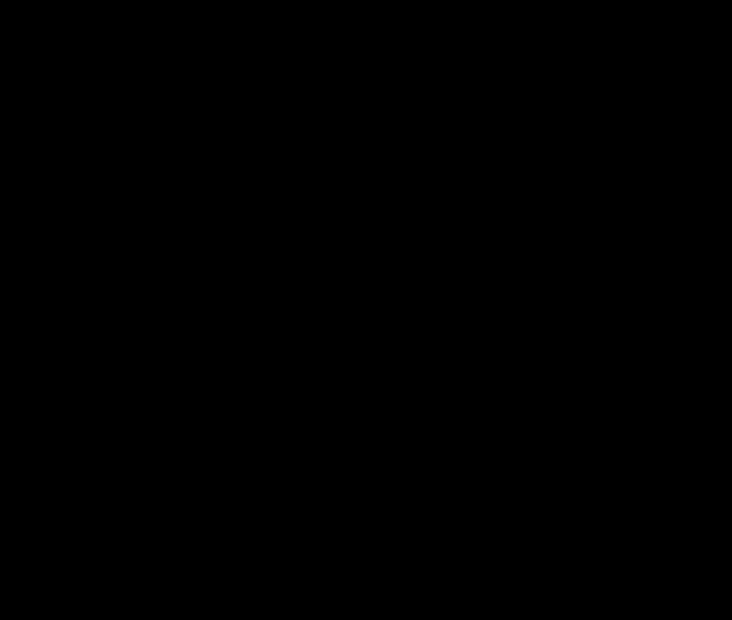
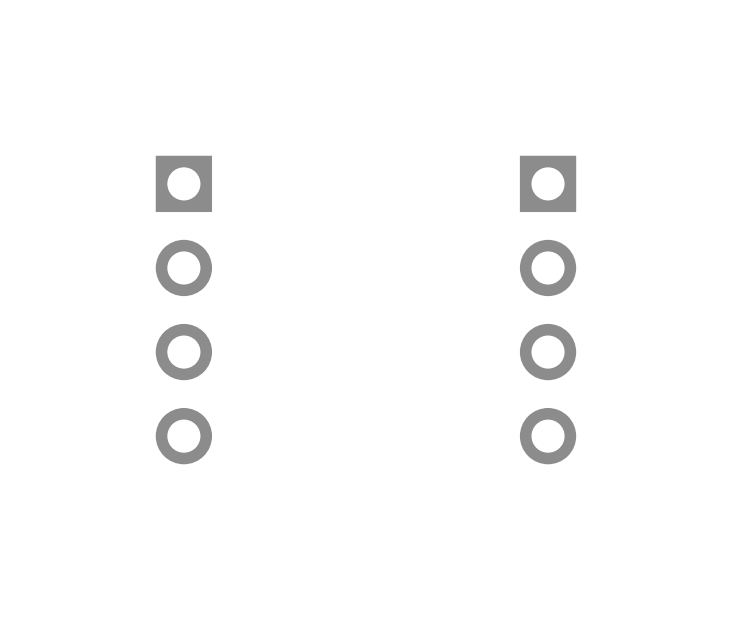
part: none -> (183, 310)
part: none -> (548, 310)

